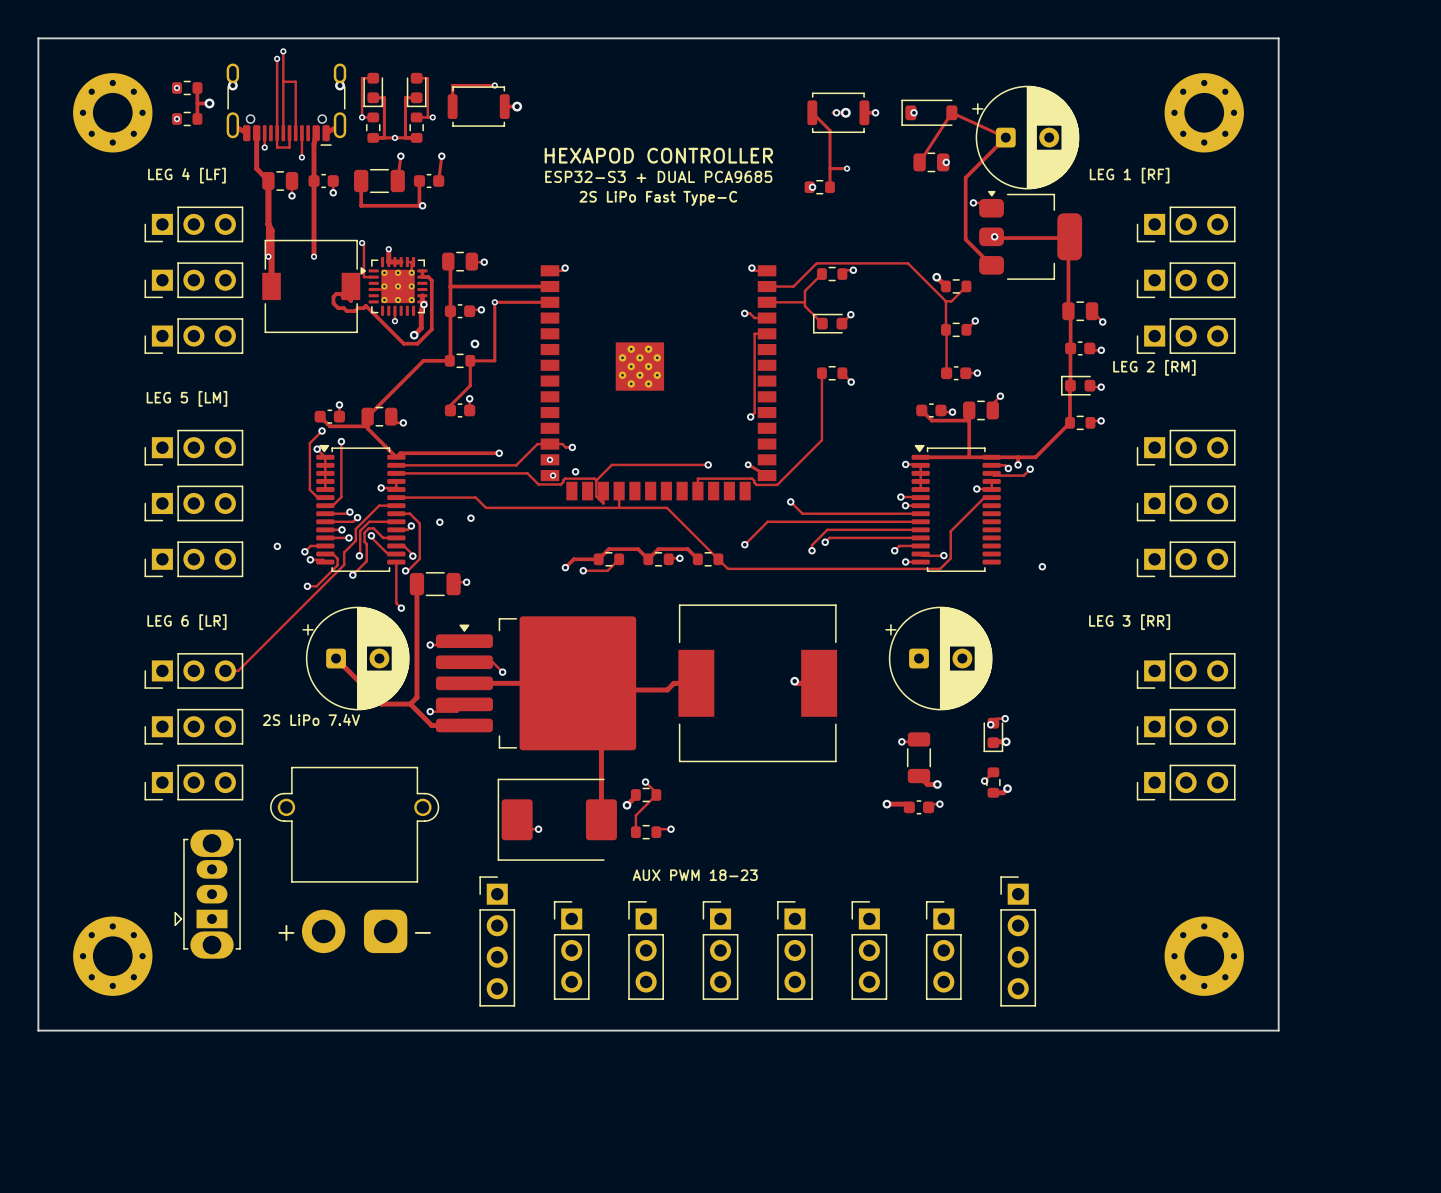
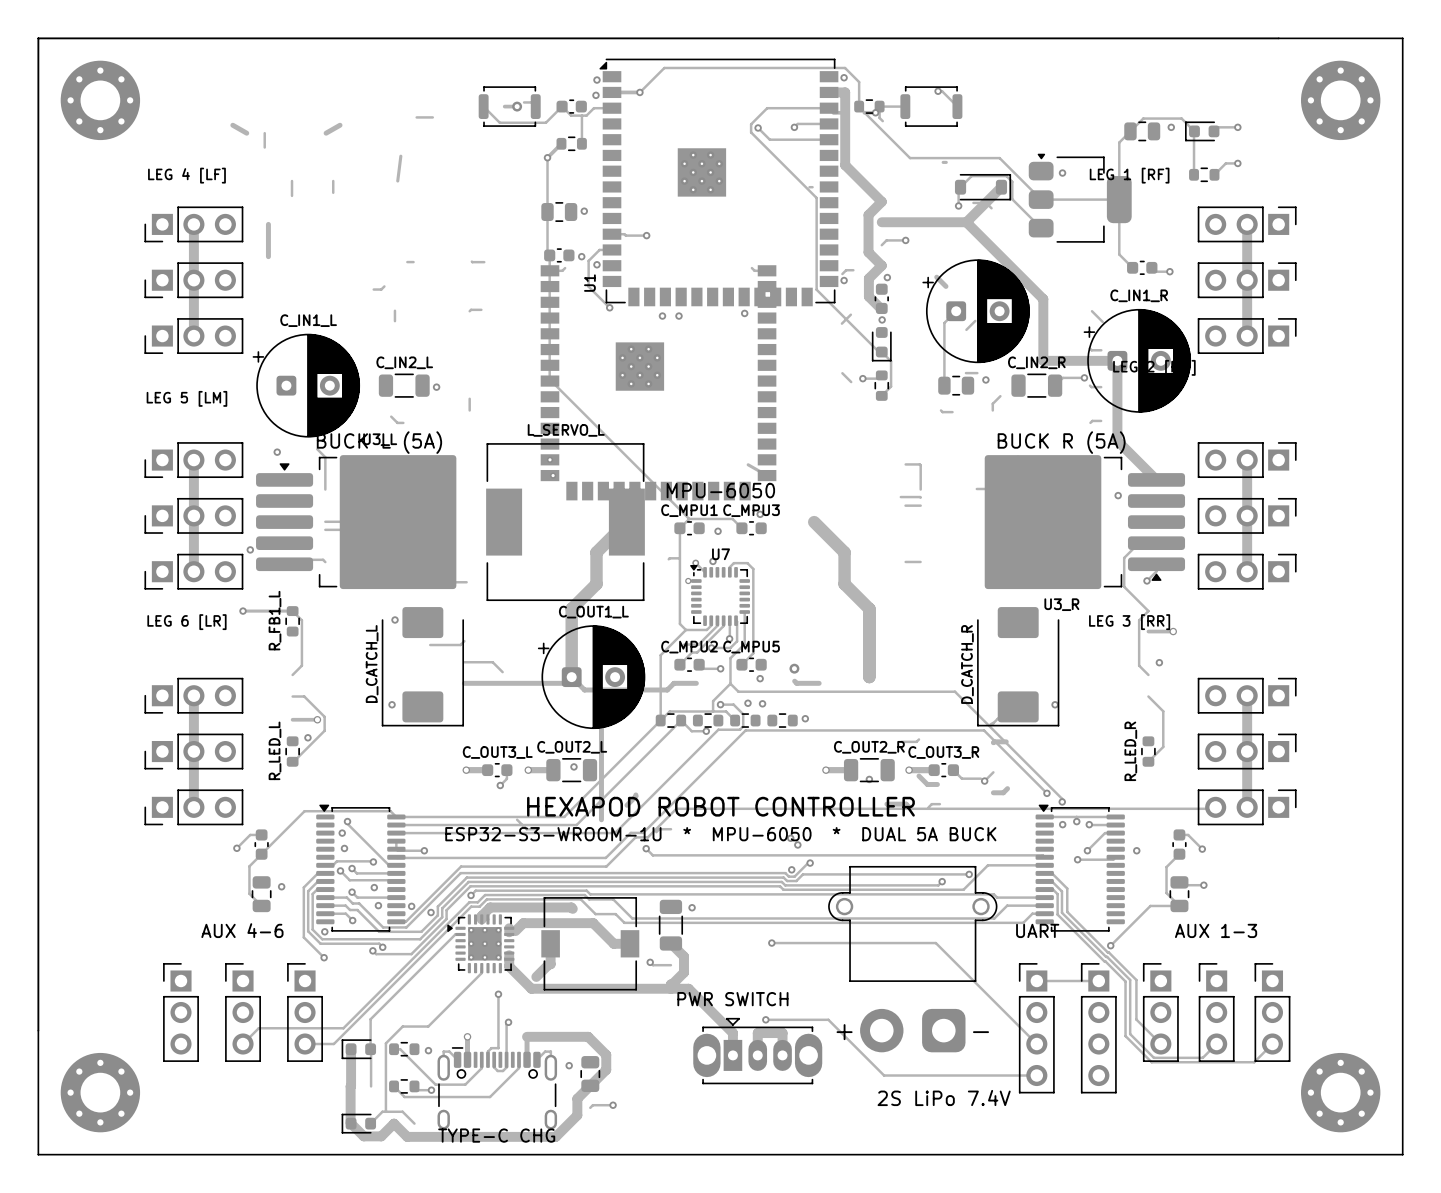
board edge: (1278, 38) (1278, 1030) (38, 1030) -> (1278, 38) (1402, 38) (1402, 1154) (38, 1154) (38, 1030)
track: (283, 51) (283, 133) -> none
via: (283, 51) -> none
track: (277, 58) (277, 147) (289, 147) (289, 133) -> none
via: (277, 58) -> none
via: none -> (844, 77)
track: (373, 78) (362, 78) (362, 117) (373, 117) -> none
track: (416, 78) (427, 78) (427, 117) -> none
via: none -> (596, 80)
track: (283, 81) (295, 81) (295, 133) -> none
via: (232, 85) -> none
via: (340, 85) -> none
track: (494, 85) (452, 85) (452, 106) -> none
via: (494, 85) -> none
via: (176, 87) -> none
part: (187, 87) -> none
track: (197, 87) (197, 118) -> none
part: (373, 89) -> none
part: (416, 89) -> none
track: none -> (938, 91) (942, 91) (957, 106)
track: none -> (612, 92) (639, 92) (664, 67) (845, 67) (859, 82) (859, 107) (910, 158) (999, 158) (1041, 199) (1119, 199)
via: none -> (639, 92)
track: none -> (829, 92) (845, 92) (845, 165) (881, 201) (868, 215) (868, 252) (881, 265) (868, 278) (868, 296) (881, 308)
via: none -> (595, 95)
track: (373, 97) (384, 97) (384, 137) -> none
track: (416, 97) (405, 97) (405, 137) -> none
part footprint: [901, 99, 958, 126] -> [900, 86, 963, 127]
track: none -> (524, 102) (531, 102) (535, 106)
track: (197, 103) (209, 103) -> none
via: (209, 103) -> none
part: (286, 104) -> none
part position: (478, 106) -> (509, 106)
track: none -> (483, 106) (499, 122) (545, 122) (562, 106) (571, 115) (586, 115) (593, 108) (612, 108)
part: none -> (571, 106)
part: none -> (869, 106)
track: none -> (905, 106) (879, 106) (879, 117) (882, 121)
track: none -> (829, 108) (767, 108) (751, 124) (751, 132) (816, 197) (816, 289) (878, 352) (881, 352) (891, 361) (891, 386) (881, 395)
part position: (112, 112) -> (100, 100)
track: (812, 112) (829, 130) (829, 187) -> none
via: (836, 112) -> none
part: (838, 112) -> none
via: (845, 112) -> none
via position: (914, 112) -> (938, 91)
part position: (1204, 112) -> (1340, 100)
track: none -> (581, 115) (581, 143)
via: (362, 117) -> none
via: (432, 117) -> none
via: (176, 118) -> none
part: (187, 118) -> none
track: none -> (829, 123) (797, 123) (794, 127)
part: (373, 127) -> none
part: (416, 127) -> none
track: none -> (758, 127) (769, 139) (829, 139)
via: none -> (758, 127)
via: none -> (794, 127)
via: none -> (1171, 127)
track: none -> (1237, 127) (1218, 127) (1214, 131)
via: none -> (1237, 127)
part: none -> (1142, 131)
part: none -> (1202, 131)
track: (256, 133) (256, 168) (268, 181) (268, 224) (271, 230) (271, 286) -> none
track: (301, 133) (301, 157) -> none
track: (316, 133) (314, 143) (314, 256) -> none
track: (373, 137) (416, 137) -> none
via: (394, 137) -> none
part: (1025, 137) -> none
track: none -> (561, 143) (547, 157) (549, 379) (689, 518)
part: none -> (571, 143)
via: (264, 147) -> none
text: HEXAPOD CONTROLLER (658, 155) -> none
via: (400, 156) -> none
track: (441, 156) (438, 181) -> none
via: (441, 156) -> none
via: (301, 157) -> none
via: none -> (547, 157)
track: (919, 162) (951, 112) (1005, 137) (965, 177) (965, 239) (991, 265) -> none
part: (931, 162) -> none
via: (946, 162) -> none
track: none -> (1237, 163) (1225, 163) (1214, 174)
via: none -> (1237, 163)
track: (829, 168) (847, 168) -> none
via: (847, 168) -> none
via: none -> (1062, 173)
track: none -> (1194, 174) (1194, 131) (1181, 118) (1143, 118) (1119, 142) (1119, 254) (1132, 267)
part: none -> (1204, 174)
text: ESP32-S3 + DUAL PCA9685 (658, 176) -> none
part: (280, 181) -> none
part: (323, 181) -> none
track: (361, 181) (361, 205) (422, 205) -> none
part: (379, 181) -> none
track: (419, 181) (419, 205) -> none
part: (429, 181) -> none
U1: none -> (718, 182)
via: (812, 187) -> none
part: (819, 187) -> none
part: none -> (982, 187)
track: none -> (1001, 187) (966, 222)
via: (333, 192) -> none
via: (292, 195) -> none
text: 2S LiPo Fast Type-C (658, 198) -> none
via position: (973, 202) -> (958, 205)
via: (422, 205) -> none
track: none -> (958, 205) (958, 189) (971, 176) (1006, 176) (1012, 181) (1012, 199) (1041, 228)
via: none -> (584, 211)
track: none -> (881, 222) (966, 222)
track: none -> (966, 222) (1043, 299) (1043, 360) (1117, 360) (1117, 440) (1156, 479)
track: none -> (193, 224) (193, 336)
part: (1186, 224) -> none
track: none -> (1247, 224) (1247, 336)
part: none -> (1247, 224)
track: none -> (612, 234) (646, 235)
via: none -> (646, 235)
part position: (1030, 235) -> (1080, 198)
track: (994, 236) (991, 236) (1068, 238) -> none
via: (994, 236) -> none
track: (1068, 238) (1070, 348) -> none
track: none -> (905, 240) (886, 240) (881, 245)
via: none -> (905, 240)
track: (362, 243) (363, 244) (363, 277) (373, 277) -> none
via: (362, 243) -> none
track: (388, 249) (388, 262) (401, 262) -> none
via: (388, 249) -> none
track: none -> (612, 249) (599, 249) (588, 260) (588, 286) (609, 307)
part: none -> (559, 255)
via: (268, 256) -> none
via: (314, 256) -> none
via: none -> (581, 256)
track: (448, 261) (450, 263) (450, 360) (423, 360) (367, 416) (367, 428) (396, 457) (400, 453) (499, 453) -> none
part position: (460, 261) -> (559, 212)
track: (411, 262) (411, 272) -> none
via: (484, 262) -> none
via: none -> (596, 264)
track: none -> (1151, 267) (1155, 271) (1169, 271)
via: (565, 268) -> none
via: (751, 268) -> none
track: (422, 270) (422, 277) (428, 277) (431, 280) (431, 329) (417, 343) (403, 343) (365, 305) (355, 311) (338, 308) (333, 303) (333, 296) (336, 293) (340, 293) (343, 298) (348, 298) (350, 301) (350, 286) -> none
via position: (853, 270) -> (844, 280)
via: none -> (1169, 271)
track: (821, 274) (804, 291) (804, 306) (822, 323) -> none
part: (832, 274) -> none
via: none -> (887, 277)
via: (936, 277) -> none
part: (1186, 280) -> none
part: none -> (1247, 280)
part: (311, 286) -> none
part: (393, 286) -> none
track: (450, 286) (549, 286) -> none
track: (767, 286) (793, 286) (816, 263) (908, 263) (945, 301) -> none
part: (956, 286) -> none
track: (966, 286) (951, 301) (945, 301) -> none
track: (422, 295) (421, 328) (414, 335) -> none
part: none -> (881, 298)
track: (945, 301) (946, 373) -> none
via: (494, 302) -> none
track: (549, 302) (494, 302) (494, 360) (470, 360) (470, 385) (450, 405) (450, 410) -> none
track: (767, 302) (804, 302) -> none
via: (423, 304) -> none
via: none -> (609, 307)
via: (481, 309) -> none
part: (460, 311) -> none
track: none -> (956, 311) (944, 323) (944, 385)
part: none -> (976, 311)
part: (1080, 311) -> none
track: (744, 313) (750, 313) (754, 318) (767, 318) -> none
via: (850, 314) -> none
via: none -> (662, 316)
via: none -> (678, 316)
via: none -> (882, 319)
via: (975, 320) -> none
via: (394, 321) -> none
via: (1102, 321) -> none
part rotation: 0° (830, 323) -> 90° counterclockwise (881, 344)
part position: (830, 323) -> (881, 344)
part: (956, 329) -> none
track: (767, 333) (754, 333) (754, 413) (750, 416) -> none
via: (414, 335) -> none
part: (1186, 336) -> none
part: none -> (1247, 336)
via: (474, 343) -> none
track: (1070, 348) (1069, 422) (1035, 457) (920, 457) -> none
part position: (1080, 348) -> (1142, 267)
via: (1101, 350) -> none
part: (460, 360) -> none
C_IN1_R: none -> (1137, 360)
part footprint: [941, 366, 972, 381] -> [938, 375, 975, 396]
track: (821, 373) (821, 440) (777, 484) (756, 484) (752, 478) (697, 478) (697, 491) -> none
part: (832, 373) -> none
via: (977, 373) -> none
track: none -> (881, 375) (878, 378) (862, 378)
track: none -> (1084, 377) (1062, 377) (1055, 385)
via: none -> (1084, 377)
via: none -> (985, 379)
via position: (851, 382) -> (862, 378)
C_IN1_L: none -> (306, 385)
C_IN2_L: none -> (404, 385)
part: none -> (881, 385)
C_IN2_R: none -> (1036, 385)
part: (1078, 385) -> none
via: none -> (436, 387)
via: (1101, 387) -> none
via: (1000, 396) -> none
via: (469, 398) -> none
via: (339, 404) -> none
part: (460, 410) -> none
track: (921, 410) (931, 420) (969, 420) -> none
part: (931, 410) -> none
track: (969, 410) (969, 457) -> none
part: (981, 410) -> none
via: (952, 412) -> none
track: (320, 416) (329, 426) (367, 426) -> none
part: (329, 416) -> none
part: (379, 416) -> none
via: (750, 416) -> none
via: (1101, 420) -> none
via: (403, 422) -> none
part: (1080, 422) -> none
track: (322, 431) (309, 443) (309, 489) (317, 497) (325, 497) -> none
via: (322, 431) -> none
track: (341, 441) (341, 497) (332, 505) (325, 505) -> none
via: (341, 441) -> none
text: none -> BUCK L (5A) (379, 442)
text: none -> BUCK R (5A) (1061, 442)
part position: (193, 447) -> (193, 460)
track: (572, 447) (565, 447) (562, 444) (537, 444) (516, 465) (396, 465) -> none
via: (572, 447) -> none
part: (1186, 447) -> none
via: (317, 449) -> none
via: none -> (277, 452)
via: (499, 453) -> none
track: none -> (193, 460) (193, 571)
track: none -> (1247, 460) (1247, 571)
part: none -> (1247, 460)
track: (708, 464) (611, 464) (596, 480) -> none
via: (708, 464) -> none
via: (748, 464) -> none
via: (905, 464) -> none
via: (1018, 464) -> none
via: (1008, 468) -> none
track: (1030, 469) (1023, 475) (993, 475) (991, 473) -> none
via: (1030, 469) -> none
via: (575, 471) -> none
track: (396, 473) (527, 473) (538, 484) (560, 484) (565, 478) (594, 478) (596, 480) -> none
track: (596, 480) (596, 496) (603, 503) (603, 491) -> none
via: (381, 487) -> none
via: (976, 488) -> none
text: none -> MPU-6050 (720, 490)
via: none -> (1118, 495)
track: (396, 497) (475, 497) (485, 507) (666, 507) (727, 568) (940, 568) (950, 558) (950, 531) (984, 497) (991, 497) -> none
via: (900, 497) -> none
track: (790, 501) (802, 513) (920, 513) -> none
via: (790, 501) -> none
part position: (193, 503) -> (193, 515)
part: (1186, 503) -> none
track: (396, 505) (379, 505) (355, 529) (355, 540) (344, 552) (344, 564) (238, 670) (225, 670) -> none
via: (905, 505) -> none
part: (360, 508) -> none
part: (956, 508) -> none
track: (349, 512) (348, 513) (325, 513) -> none
via: (349, 512) -> none
track: (396, 513) (409, 513) (419, 523) (419, 558) (405, 570) -> none
via: none -> (760, 514)
part: none -> (1247, 515)
via: (357, 517) -> none
via: (470, 518) -> none
track: none -> (689, 518) (732, 518) (741, 528)
track: none -> (689, 518) (679, 528) (679, 623) (685, 629)
track: (396, 521) (369, 521) (360, 530) (359, 555) -> none
track: (920, 521) (767, 521) (744, 544) -> none
U3_L: none -> (356, 522)
via: (439, 522) -> none
L_SERVO_L: none -> (565, 522)
track: none -> (626, 522) (596, 552) (596, 584) (571, 608) (571, 677)
track: none -> (814, 522) (844, 552) (844, 584) (869, 608) (869, 677)
U3_R: none -> (1084, 522)
via: (411, 526) -> none
C_MPU1: none -> (689, 528)
C_MPU3: none -> (751, 528)
via: (341, 529) -> none
track: (920, 529) (827, 529) (812, 545) (812, 550) -> none
via: none -> (718, 531)
track: (371, 535) (387, 554) (396, 554) -> none
via: (371, 535) -> none
track: (325, 537) (348, 537) -> none
via: (349, 537) -> none
track: (396, 537) (383, 537) (373, 528) (368, 528) (364, 532) (366, 561) (352, 575) -> none
track: (920, 537) (829, 537) (825, 542) -> none
via: (825, 542) -> none
track: none -> (1156, 543) (1138, 543) (1124, 557) (1124, 586) (1148, 611) (1139, 620) (1139, 665) (1148, 674)
via: (744, 544) -> none
track: (325, 545) (310, 545) (304, 551) -> none
track: (920, 545) (899, 545) (894, 550) -> none
via: (277, 546) -> none
via: none -> (250, 549)
via: (812, 550) -> none
via: (894, 550) -> none
via: (304, 551) -> none
track: (325, 554) (332, 554) (337, 558) (337, 565) (316, 586) (307, 586) -> none
track: (920, 554) (922, 555) (943, 555) -> none
via: (359, 555) -> none
via: (943, 555) -> none
via: (412, 556) -> none
via: (679, 558) -> none
part position: (193, 559) -> (193, 571)
via: (310, 559) -> none
part: (608, 559) -> none
track: (619, 559) (607, 570) (583, 570) -> none
part: (658, 559) -> none
track: (697, 559) (687, 549) (658, 549) (648, 559) (638, 549) (608, 549) (598, 559) (573, 559) (565, 567) -> none
part: (708, 559) -> none
part: (1186, 559) -> none
via: none -> (713, 561)
via: (905, 561) -> none
track: (396, 562) (396, 603) (401, 608) -> none
track: none -> (695, 563) (705, 572)
via: none -> (695, 563)
track: none -> (1156, 564) (1156, 571) (1147, 580)
via: (1042, 566) -> none
via: (565, 567) -> none
via: (405, 570) -> none
via: (583, 570) -> none
part: none -> (1247, 571)
track: none -> (729, 572) (729, 567) (733, 563) (747, 563) (753, 569) (753, 653) (741, 664)
via: (352, 575) -> none
via: none -> (1147, 580)
via: none -> (688, 581)
via: (466, 582) -> none
track: (416, 584) (416, 697) (410, 704) -> none
part: (435, 584) -> none
via: (307, 586) -> none
U7: none -> (720, 595)
via position: (401, 608) -> (395, 619)
track: none -> (243, 611) (292, 611) (301, 620) (301, 665) (292, 674)
via: none -> (243, 611)
track: none -> (744, 612) (744, 644) (730, 658) (730, 683)
track: none -> (711, 620) (711, 625) (706, 629) (685, 629)
track: none -> (717, 620) (717, 625) (698, 644) (684, 644)
track: none -> (723, 620) (723, 626) (697, 652) (692, 652) (679, 664)
track: none -> (729, 620) (729, 638)
track: none -> (736, 620) (737, 641) (730, 647) (711, 647)
R_FB1_L: none -> (292, 621)
track: none -> (685, 629) (660, 655) (660, 720)
track: none -> (1148, 631) (1173, 631)
via: none -> (1173, 631)
via: none -> (729, 638)
via: (430, 645) -> none
via: none -> (711, 647)
track: (336, 658) (381, 704) (410, 704) -> none
part: (355, 658) -> none
part: (938, 658) -> none
via: none -> (1159, 662)
C_MPU2: none -> (689, 664)
track: none -> (699, 664) (703, 668) (720, 668)
C_MPU5: none -> (751, 664)
D_CATCH_L: none -> (422, 666)
D_CATCH_R: none -> (1018, 666)
via: none -> (720, 668)
via: none -> (794, 668)
part: (193, 670) -> none
part: (1186, 670) -> none
via: (502, 672) -> none
C_OUT1_L: none -> (591, 677)
via: none -> (760, 678)
via: (794, 681) -> none
part: (536, 683) -> none
track: none -> (730, 683) (738, 691) (955, 691) (1062, 798) (1062, 801)
track: none -> (730, 683) (713, 701) (713, 711)
part: (757, 683) -> none
track: none -> (193, 695) (193, 807)
part: none -> (193, 695)
track: none -> (1247, 695) (1247, 807)
part: none -> (1247, 695)
track: none -> (292, 696) (304, 696) (324, 716) (324, 730) (292, 761)
track: none -> (1148, 696) (1163, 711) (1163, 746) (1148, 761)
via: none -> (747, 703)
via: none -> (762, 703)
via: none -> (392, 704)
track: (410, 704) (431, 725) (464, 725) -> none
track: (464, 704) (457, 711) (430, 711) -> none
track: none -> (720, 704) (733, 704) (743, 714) (743, 726) (739, 729) (718, 729) (615, 833) (396, 833)
via: none -> (720, 704)
via: none -> (1055, 704)
via: (430, 711) -> none
via: none -> (805, 718)
via: (1005, 718) -> none
track: none -> (292, 719) (317, 719)
text: 2S LiPo 7.4V (311, 719) -> none
via: none -> (317, 719)
part: none -> (670, 720)
part: none -> (708, 720)
track: none -> (735, 720) (726, 711) (669, 711) (564, 816) (396, 816) (390, 811) (304, 811) (249, 866) (249, 893) (261, 905)
part: none -> (745, 720)
part: none -> (782, 720)
via: (990, 724) -> none
part: (193, 726) -> none
part: (1186, 726) -> none
track: none -> (706, 731) (691, 731) (681, 720) (576, 825) (396, 825)
via: none -> (706, 731)
part: (993, 734) -> none
via: none -> (307, 737)
via: (901, 741) -> none
via: (1006, 741) -> none
part: none -> (193, 751)
R_LED_L: none -> (292, 751)
R_LED_R: none -> (1148, 751)
part: none -> (1247, 751)
part: (918, 757) -> none
part footprint: [270, 766, 440, 954] -> [316, 804, 406, 932]
via: none -> (573, 766)
track: none -> (466, 770) (487, 770)
via: none -> (466, 770)
C_OUT3_L: none -> (497, 770)
track: none -> (506, 770) (506, 778) (500, 785)
track: none -> (528, 770) (553, 770)
via: none -> (528, 770)
C_OUT2_L: none -> (571, 770)
track: none -> (825, 770) (851, 770)
via: none -> (825, 770)
C_OUT2_R: none -> (869, 770)
track: none -> (909, 770) (934, 770)
via: none -> (909, 770)
C_OUT3_R: none -> (943, 770)
track: none -> (953, 770) (961, 778) (980, 778)
via: none -> (869, 779)
part: (193, 782) -> none
track: (645, 782) (656, 794) (635, 815) (635, 832) -> none
via: (645, 782) -> none
part: (993, 782) -> none
part: (1186, 782) -> none
via: (937, 784) -> none
via: none -> (500, 785)
via: (1007, 788) -> none
track: none -> (1046, 793) (984, 730) (745, 730) (643, 832) (630, 832) (605, 857) (396, 857)
via: none -> (1046, 793)
part: (646, 794) -> none
via: none -> (1062, 801)
via: (886, 804) -> none
via: (939, 804) -> none
via: (626, 805) -> none
text: none -> HEXAPOD ROBOT CONTROLLER (720, 806)
part: none -> (193, 807)
part: (918, 807) -> none
track: none -> (1215, 807) (676, 808) (647, 837) (635, 837) (606, 866) (461, 866) (405, 921) (396, 921)
part: none -> (1247, 807)
track: none -> (1044, 816) (1115, 816)
part: (557, 819) -> none
track: none -> (347, 821) (347, 823) (389, 865) (396, 865)
via: none -> (347, 821)
via: none -> (1076, 821)
via: none -> (1062, 824)
track: none -> (1089, 824) (1115, 825)
via: none -> (1089, 824)
via: (538, 829) -> none
via position: (671, 829) -> (646, 848)
part: (646, 832) -> none
via: none -> (342, 833)
track: none -> (1115, 833) (1105, 833) (1087, 850)
track: none -> (261, 834) (250, 834) (236, 848)
text: none -> ESP32-S3-WROOM-1U * MPU-6050 * DUAL 5A BUCK (720, 834)
track: none -> (1179, 834) (1188, 834) (1202, 849)
via: none -> (790, 838)
track: none -> (396, 841) (397, 850) (424, 850)
part: none -> (261, 844)
via: none -> (797, 844)
part: none -> (1179, 844)
via: none -> (236, 848)
via: none -> (344, 848)
track: none -> (646, 848) (652, 855) (1042, 855) (1044, 857)
via: none -> (1202, 849)
via: none -> (424, 850)
via: none -> (1087, 850)
via: none -> (1136, 850)
track: none -> (1179, 854) (1166, 867) (1166, 893) (1179, 905) (1150, 905) (1110, 945)
track: none -> (1115, 857) (1113, 859) (1077, 859)
via: none -> (1077, 859)
track: none -> (373, 861) (336, 861) (332, 865) (325, 865)
via: none -> (373, 861)
track: none -> (810, 863) (794, 876) (788, 876) (785, 873) (460, 873) (406, 927) (383, 927) (359, 903) (352, 903) (346, 897) (325, 897)
via: none -> (810, 863)
track: none -> (1044, 865) (987, 865) (963, 889) (783, 889) (780, 886) (470, 886) (446, 910) (446, 918) (411, 954) (376, 954) (372, 950)
track: none -> (352, 868) (356, 873) (396, 873)
via: none -> (352, 868)
part: none -> (1080, 868)
via: none -> (791, 869)
track: none -> (340, 870) (349, 880) (396, 881)
via: none -> (340, 870)
track: none -> (325, 873) (317, 873) (303, 887) (303, 937) (324, 957)
track: none -> (1044, 873) (1052, 873) (1067, 888) (1067, 911) (1136, 980) (1136, 1019) (1160, 1044)
track: none -> (969, 874) (802, 874) (796, 881) (787, 881) (783, 877) (466, 877) (437, 906) (437, 915) (421, 931) (379, 931) (357, 910) (350, 910) (345, 905) (325, 905)
via: none -> (969, 874)
text: AUX PWM 18-23 (695, 875) -> none
track: none -> (325, 881) (317, 881) (308, 891) (308, 931) (320, 943) (379, 943) (382, 947)
track: none -> (942, 881) (938, 885) (785, 885) (781, 881) (468, 881) (442, 908) (442, 917) (420, 939) (322, 939) (312, 929) (312, 894) (317, 889) (325, 889)
via: none -> (942, 881)
track: none -> (1044, 881) (1051, 881) (1061, 891) (1061, 912) (1130, 979) (1130, 1034) (1153, 1057) (1202, 1057) (1216, 1044)
track: none -> (1179, 882) (1182, 885) (1203, 885)
via: none -> (1203, 885)
via: none -> (281, 886)
via: none -> (374, 887)
track: none -> (1044, 889) (1052, 889) (1057, 894) (1057, 914) (1125, 981) (1125, 1036) (1151, 1062) (1254, 1062) (1272, 1044)
track: none -> (352, 892) (357, 897) (396, 897)
via: none -> (352, 892)
part: (207, 894) -> none
part: none -> (261, 894)
part: none -> (1179, 894)
track: none -> (471, 895) (475, 890) (586, 890) (590, 894) (993, 894) (997, 897) (1044, 897)
via: none -> (471, 895)
via: none -> (378, 905)
track: none -> (1044, 905) (1007, 905) (994, 918) (632, 918) (613, 899) (589, 899) (584, 895) (485, 895) (477, 902) (469, 902) (343, 1028) (258, 1028) (243, 1044)
via: none -> (411, 906)
via: none -> (692, 907)
track: none -> (572, 908) (490, 907) (481, 915) (481, 919) (487, 919)
via: none -> (431, 912)
track: none -> (325, 913) (345, 913) (352, 920)
track: none -> (1044, 913) (1032, 913) (1023, 922) (624, 922) (615, 914) (595, 914) (580, 899) (486, 899) (479, 906) (471, 906) (333, 1044) (305, 1044)
via: none -> (352, 920)
part: none -> (670, 925)
text: none -> AUX 4-6 (242, 930)
text: none -> UART (1037, 930)
text: none -> AUX 1-3 (1216, 930)
via: none -> (324, 931)
track: none -> (460, 934) (455, 934) (370, 1019) (371, 1086)
track: none -> (509, 934) (509, 928) (515, 931) (523, 923) (593, 923) (613, 943) (629, 943)
part: (497, 941) -> none
part: (1018, 941) -> none
part: none -> (480, 943)
track: none -> (550, 943) (550, 964) (536, 976)
part: none -> (590, 943)
track: none -> (670, 943) (684, 956) (684, 972) (670, 984) (670, 988)
track: none -> (771, 943) (935, 943) (1036, 1044)
via: none -> (771, 943)
via: none -> (1110, 945)
via: none -> (382, 947)
via: none -> (372, 950)
part: (571, 950) -> none
part: (646, 950) -> none
part: (720, 950) -> none
part: (794, 950) -> none
part: (869, 950) -> none
part: (943, 950) -> none
track: none -> (509, 953) (509, 966) (531, 988) (688, 988) (732, 1033) (732, 1055)
part position: (112, 956) -> (100, 1092)
part position: (1204, 956) -> (1340, 1092)
via: none -> (324, 957)
part: none -> (912, 959)
track: none -> (650, 962) (653, 965) (670, 965)
via: none -> (650, 962)
track: none -> (481, 968) (481, 973) (428, 1026) (402, 1026) (385, 1043) (385, 1111)
track: none -> (1036, 981) (1098, 981)
track: none -> (498, 994) (498, 1048) (491, 1048) (487, 1051) (487, 1059)
via: none -> (498, 994)
text: none -> PWR SWITCH (732, 999)
part: none -> (181, 1012)
part: none -> (243, 1012)
part: none -> (305, 1012)
part: none -> (1160, 1012)
part: none -> (1216, 1012)
part: none -> (1272, 1012)
track: none -> (765, 1019) (828, 1019) (884, 1075) (1036, 1075)
via: none -> (765, 1019)
track: none -> (508, 1022) (506, 1024) (506, 1067) (502, 1071) (497, 1071) (494, 1067) (494, 1059)
via: none -> (508, 1022)
part: none -> (1036, 1028)
part: none -> (1098, 1028)
track: none -> (467, 1036) (467, 1059)
via: none -> (467, 1036)
track: none -> (351, 1049) (350, 1123) (363, 1136) (381, 1136) (394, 1123) (407, 1136) (555, 1136) (577, 1115) (577, 1098) (606, 1069) (606, 1054) (588, 1036) (527, 1036) (527, 1059)
part: none -> (358, 1049)
track: none -> (394, 1049) (400, 1049) (435, 1084) (465, 1084) (481, 1068) (481, 1059)
part: none -> (404, 1049)
via: none -> (428, 1050)
part: none -> (757, 1051)
track: none -> (757, 1055) (757, 1033) (782, 1033) (782, 1055)
track: none -> (457, 1059) (449, 1051) (443, 1051) (443, 1067)
track: none -> (518, 1059) (518, 1068) (490, 1097) (404, 1097) (394, 1086)
track: none -> (536, 1059) (545, 1051) (550, 1051) (550, 1067)
via: none -> (569, 1065)
part: none -> (590, 1074)
part: none -> (404, 1086)
track: none -> (414, 1086) (418, 1090) (431, 1090)
part: none -> (497, 1088)
via: none -> (431, 1090)
text: none -> 2S LiPo 7.4V (944, 1097)
track: none -> (613, 1105) (592, 1105) (590, 1107)
via: none -> (613, 1105)
part: none -> (358, 1123)
track: none -> (370, 1123) (382, 1111) (402, 1111) (414, 1123)
text: none -> TYPE-C CHG (496, 1135)

